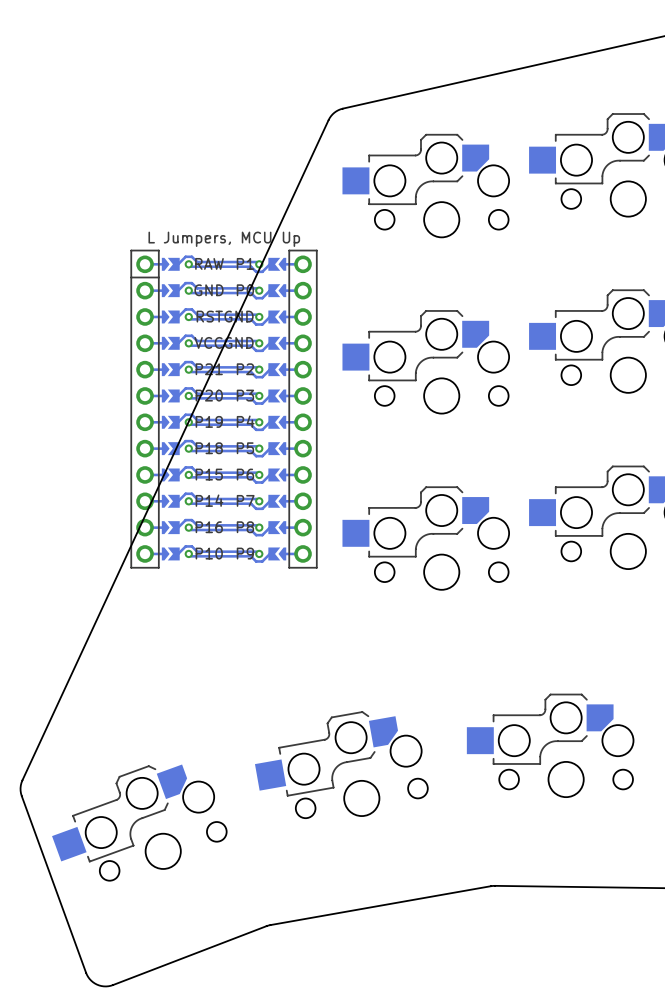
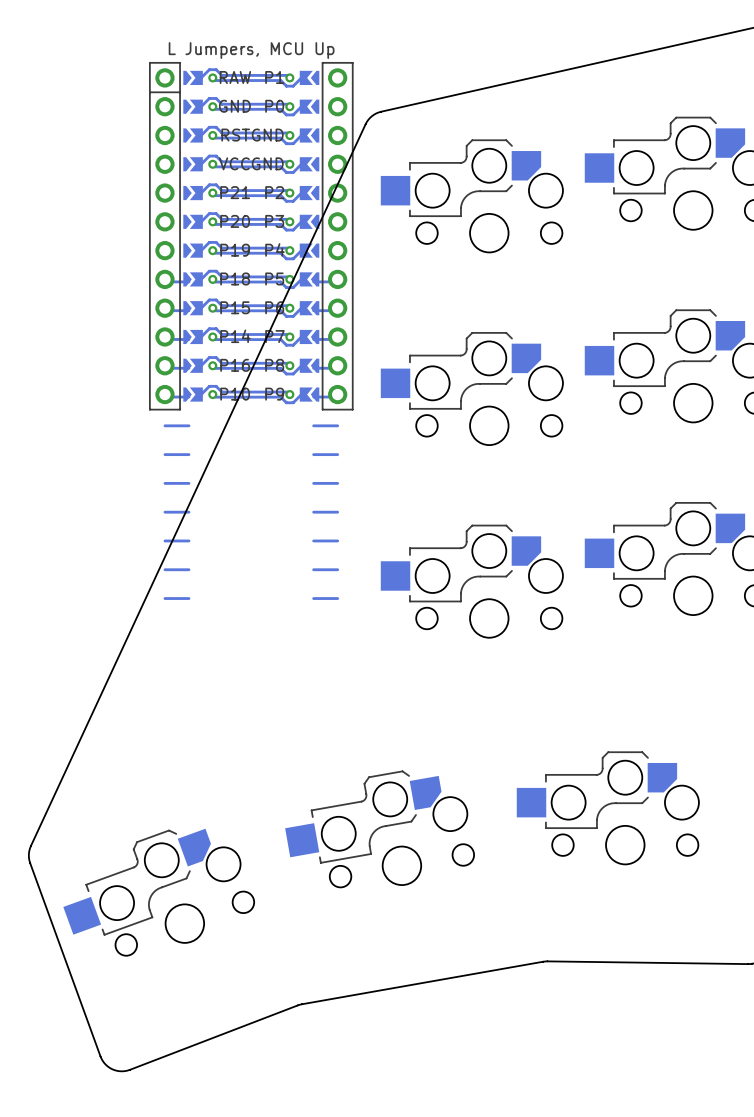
track: (257, 262) (197, 262) (191, 256) (185, 256) (178, 264) (174, 264) -> (287, 75) (221, 75) (216, 69) (209, 69) (201, 77) (197, 77)
track: (273, 264) (269, 264) (262, 271) (256, 271) (251, 266) (191, 266) -> (305, 77) (301, 77) (293, 86) (286, 86) (280, 80) (215, 80)
track: (257, 288) (197, 288) (191, 283) (185, 283) (178, 290) (174, 290) -> (287, 104) (221, 104) (216, 98) (209, 98) (201, 106) (197, 106)
track: (273, 290) (269, 290) (262, 298) (256, 298) (251, 293) (191, 293) -> (305, 106) (301, 106) (293, 114) (286, 114) (280, 109) (215, 109)
track: (257, 314) (197, 314) (191, 309) (185, 309) (178, 316) (174, 316) -> (287, 132) (221, 132) (216, 127) (209, 127) (201, 135) (197, 135)
track: (273, 316) (269, 316) (262, 324) (256, 324) (251, 319) (191, 319) -> (305, 135) (301, 135) (293, 143) (286, 143) (280, 138) (215, 138)
track: (257, 341) (197, 341) (191, 335) (185, 335) (178, 343) (174, 343) -> (287, 161) (221, 161) (216, 156) (209, 156) (201, 164) (197, 164)
track: (273, 343) (269, 343) (262, 350) (256, 350) (251, 345) (191, 345) -> (305, 164) (301, 164) (293, 172) (286, 172) (280, 166) (215, 166)
track: (257, 367) (197, 367) (191, 362) (185, 362) (178, 369) (174, 369) -> (287, 190) (221, 190) (216, 184) (209, 184) (201, 193) (197, 193)
track: (273, 369) (269, 369) (262, 377) (256, 377) (251, 372) (191, 372) -> (305, 193) (301, 193) (293, 201) (286, 201) (280, 195) (215, 195)
track: (257, 393) (197, 393) (191, 388) (185, 388) (178, 395) (174, 395) -> (287, 219) (221, 219) (216, 213) (209, 213) (201, 221) (197, 221)
track: (273, 395) (269, 395) (262, 403) (256, 403) (251, 398) (191, 398) -> (305, 221) (301, 221) (293, 230) (286, 230) (280, 224) (215, 224)
part position: (224, 409) -> (251, 236)
track: (257, 420) (197, 420) (191, 414) (185, 414) (178, 422) (174, 422) -> (287, 248) (221, 248) (216, 242) (209, 242) (201, 250) (197, 250)
track: (273, 422) (269, 422) (262, 429) (256, 429) (251, 424) (191, 424) -> (305, 250) (301, 250) (293, 258) (286, 258) (280, 253) (215, 253)
track: (257, 446) (197, 446) (191, 441) (185, 441) (178, 448) (174, 448) -> (287, 276) (221, 276) (216, 271) (209, 271) (201, 279) (197, 279)
track: (273, 448) (269, 448) (262, 456) (256, 456) (251, 451) (191, 451) -> (305, 279) (301, 279) (293, 287) (286, 287) (280, 282) (215, 282)
track: (257, 472) (197, 472) (191, 467) (185, 467) (178, 474) (174, 474) -> (287, 305) (221, 305) (216, 299) (209, 299) (201, 308) (197, 308)
track: (273, 474) (269, 474) (262, 482) (256, 482) (251, 477) (191, 477) -> (305, 308) (301, 308) (293, 316) (286, 316) (280, 310) (215, 310)
track: (257, 499) (197, 499) (191, 493) (185, 493) (178, 501) (174, 501) -> (287, 334) (221, 334) (216, 328) (209, 328) (201, 336) (197, 336)
track: (273, 501) (269, 501) (262, 508) (256, 508) (251, 503) (191, 503) -> (305, 336) (301, 336) (293, 345) (286, 345) (280, 339) (215, 339)
track: (257, 525) (197, 525) (191, 520) (185, 520) (178, 527) (174, 527) -> (287, 363) (221, 363) (216, 357) (209, 357) (201, 365) (197, 365)
track: (273, 527) (269, 527) (262, 535) (256, 535) (251, 530) (191, 530) -> (305, 365) (301, 365) (293, 373) (286, 373) (280, 368) (215, 368)
track: (257, 551) (197, 551) (191, 546) (185, 546) (178, 553) (174, 553) -> (287, 392) (221, 392) (216, 386) (209, 386) (201, 394) (197, 394)
track: (273, 553) (269, 553) (262, 561) (256, 561) (251, 556) (191, 556) -> (305, 394) (301, 394) (293, 402) (286, 402) (280, 397) (215, 397)

